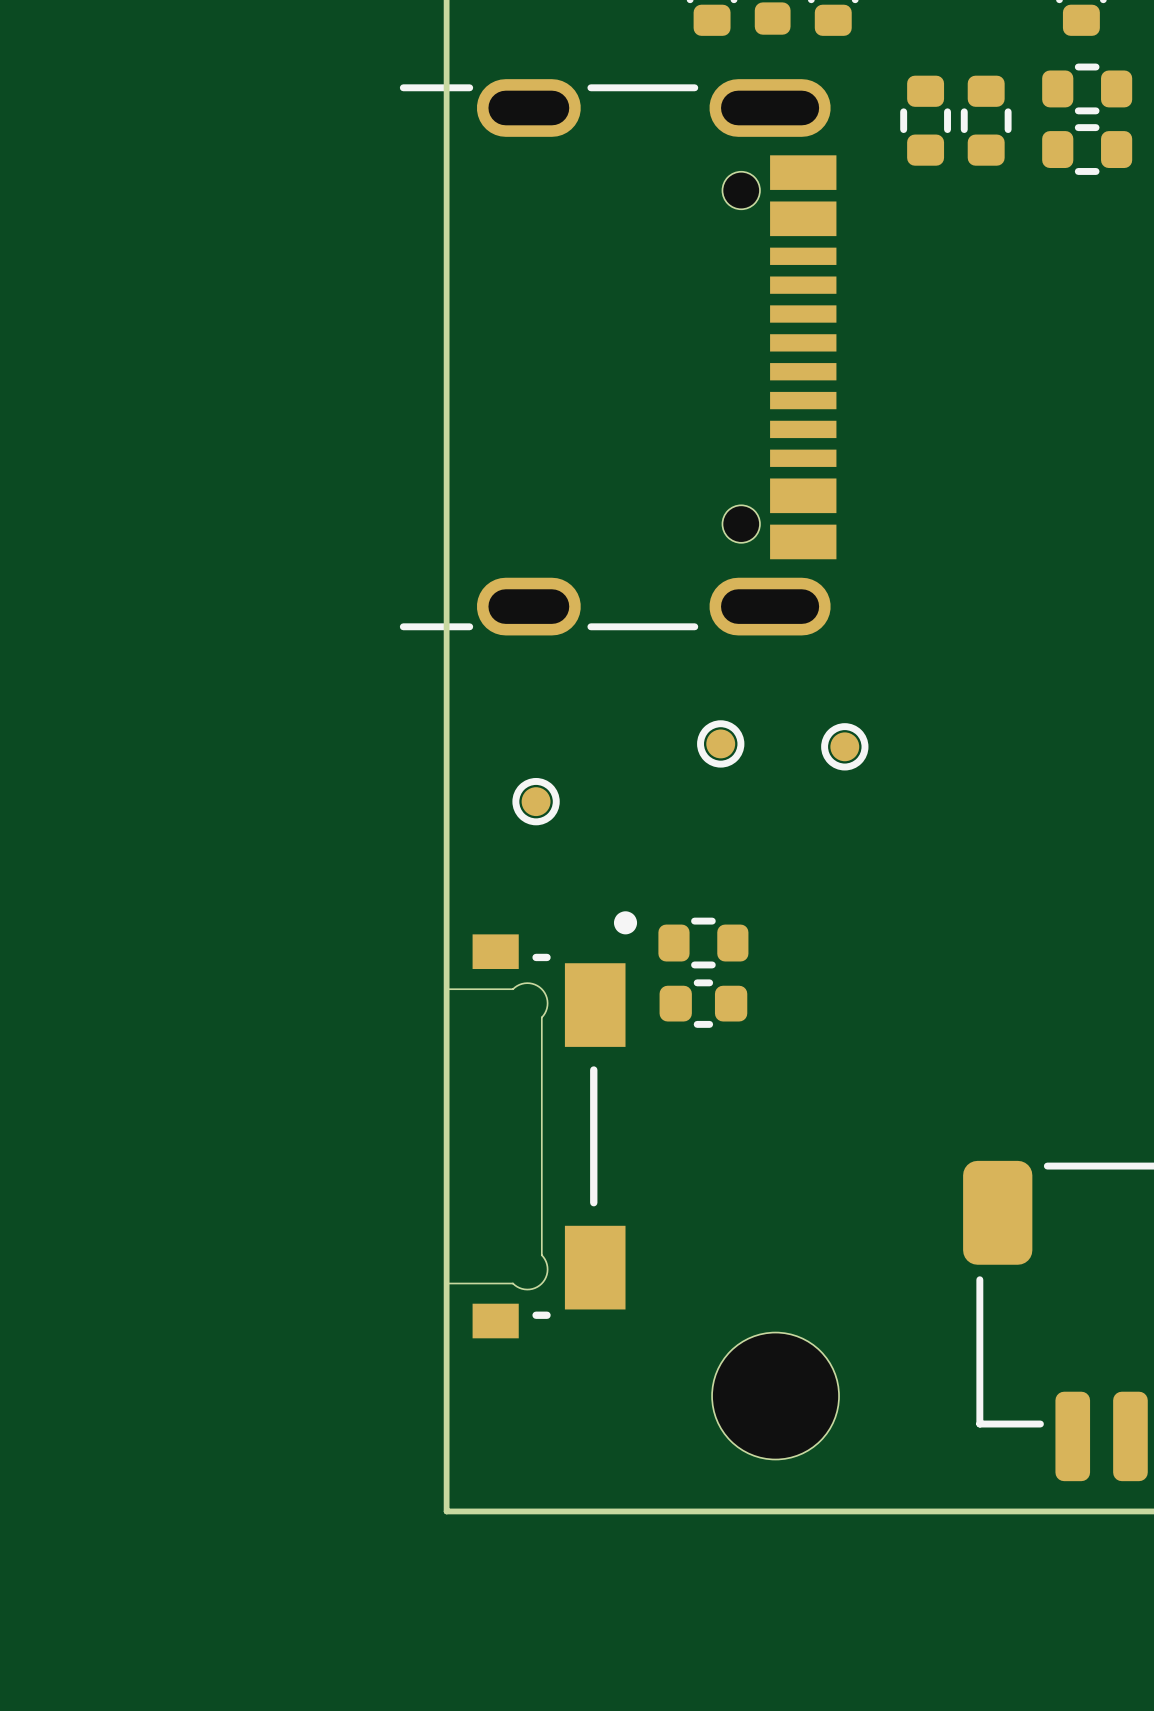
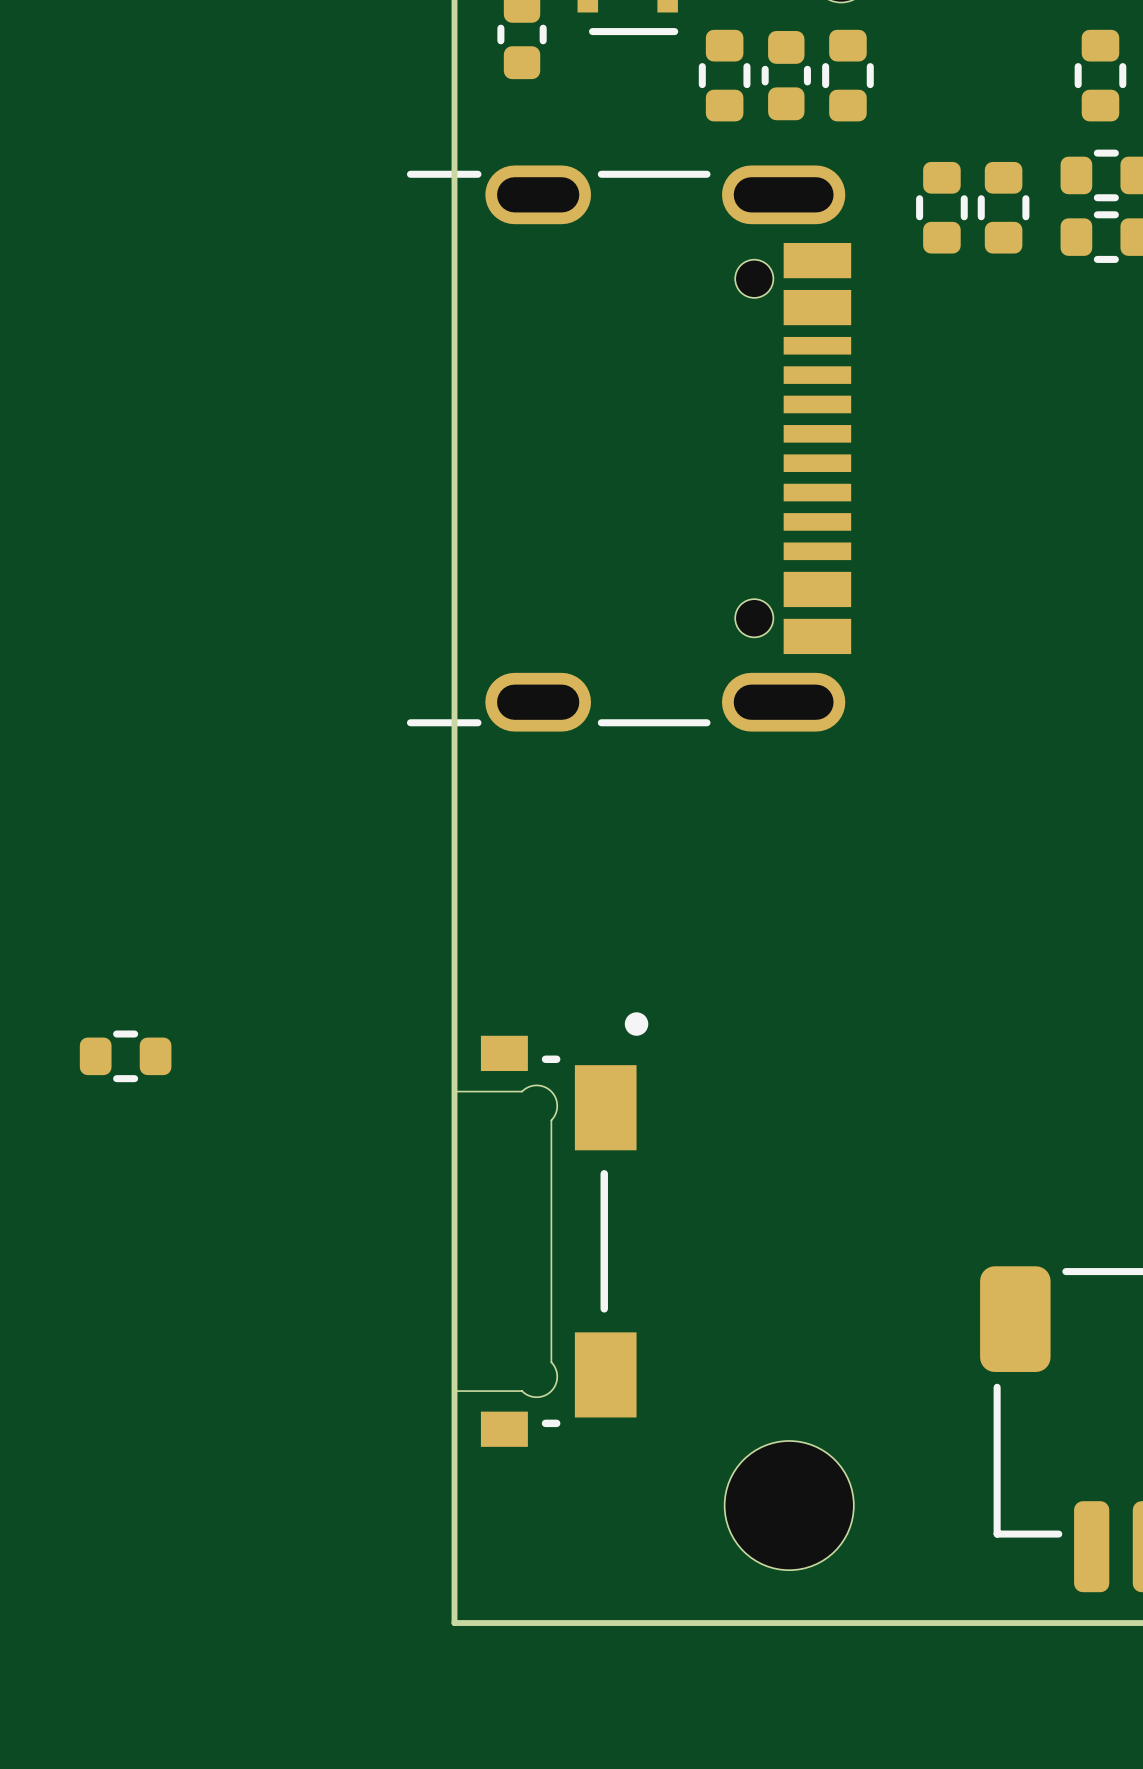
part: (720, 743) -> none
part: (844, 746) -> none
part: (536, 801) -> none
part position: (703, 943) -> (125, 1056)
part: (703, 1003) -> none

